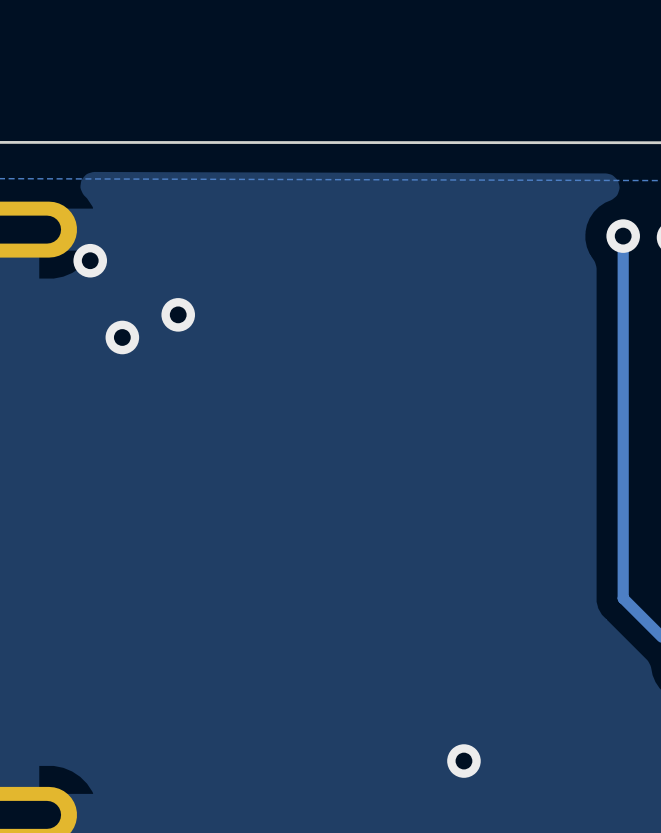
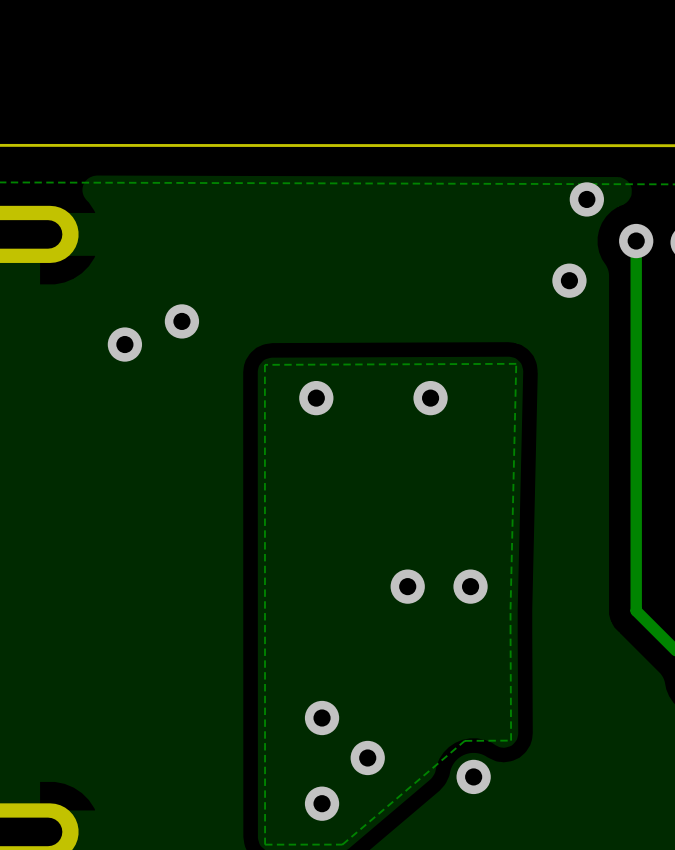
via: none -> (586, 199)
via: (90, 260) -> none
via: none -> (569, 280)
zone outline: none -> (516, 363) (510, 609) (511, 740) (464, 740) (342, 844) (265, 844) (264, 364) (516, 363)
via: none -> (316, 398)
via: none -> (430, 398)
via: none -> (407, 586)
via: none -> (470, 586)
via: none -> (322, 718)
via: none -> (367, 757)
via: none -> (322, 803)

